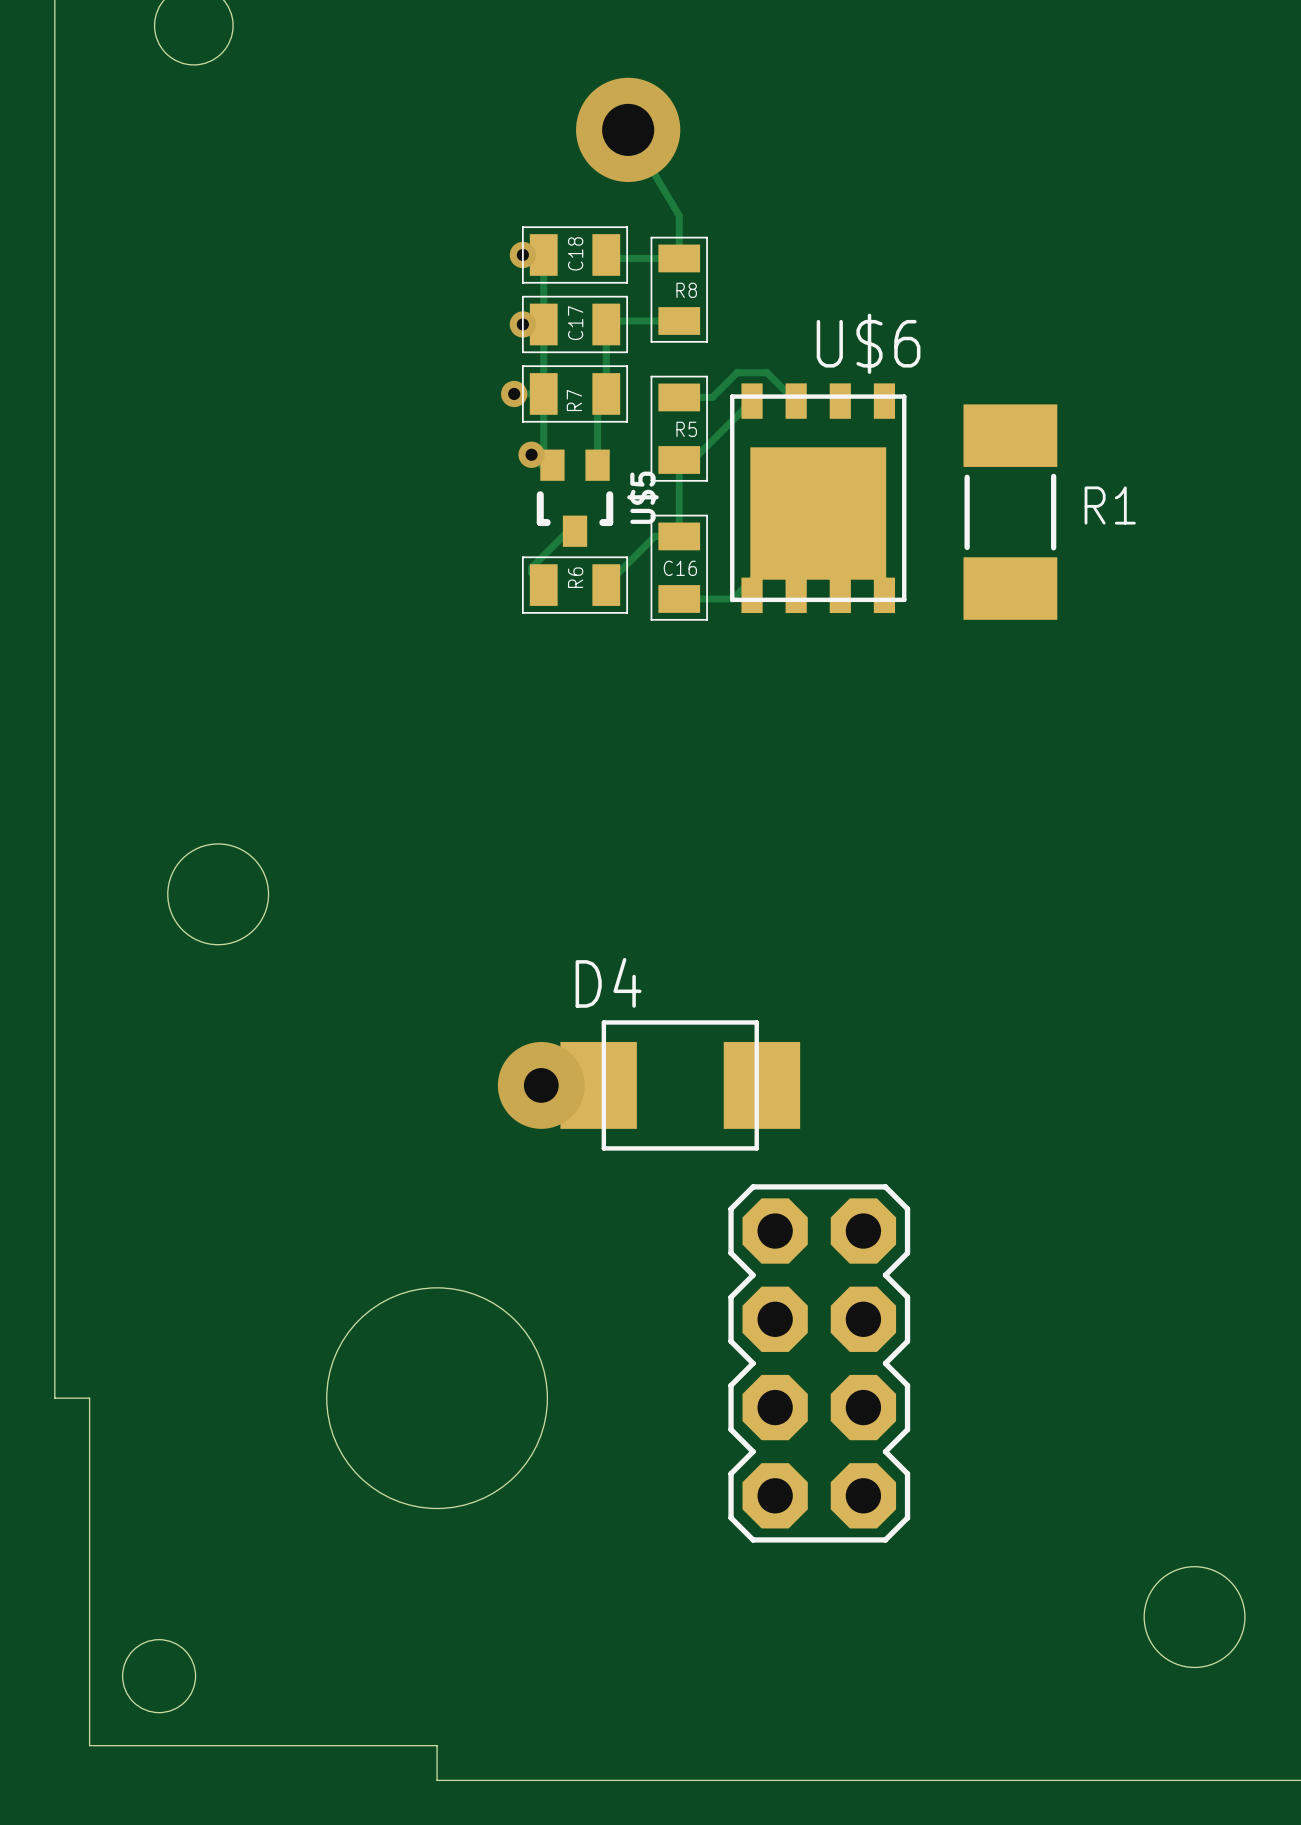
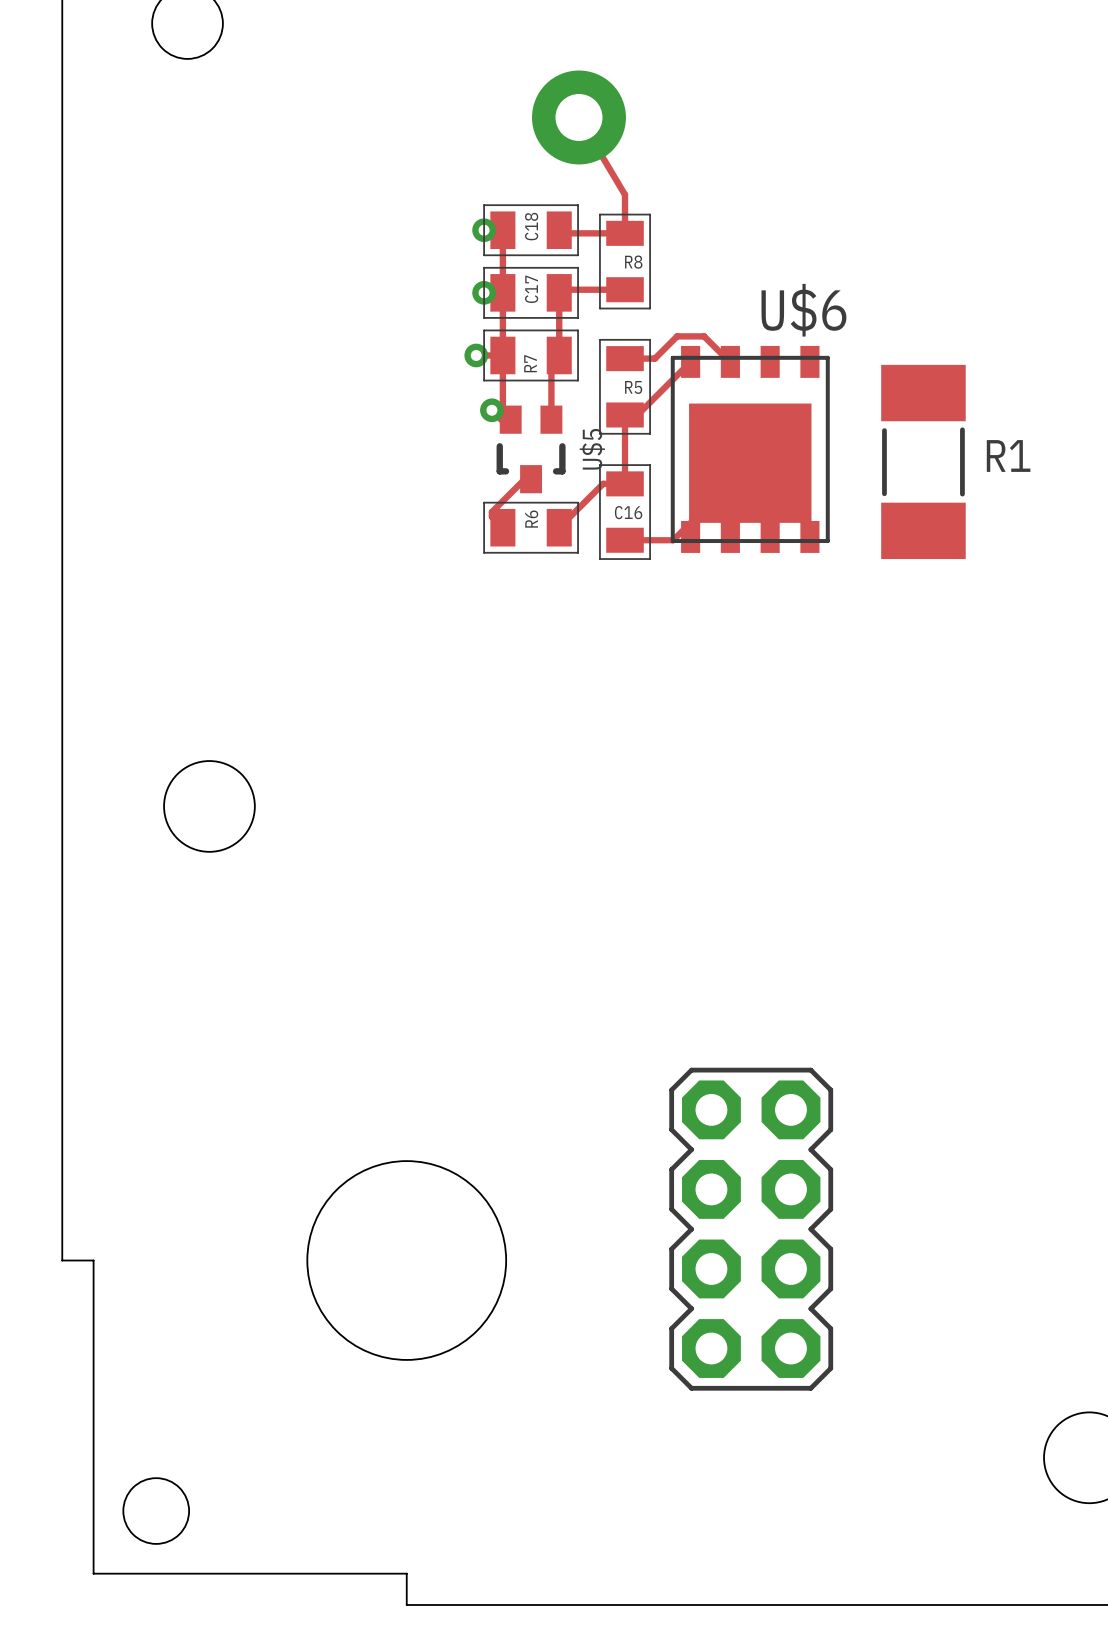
via: (541, 1085) -> none
D4: (680, 1085) -> none

